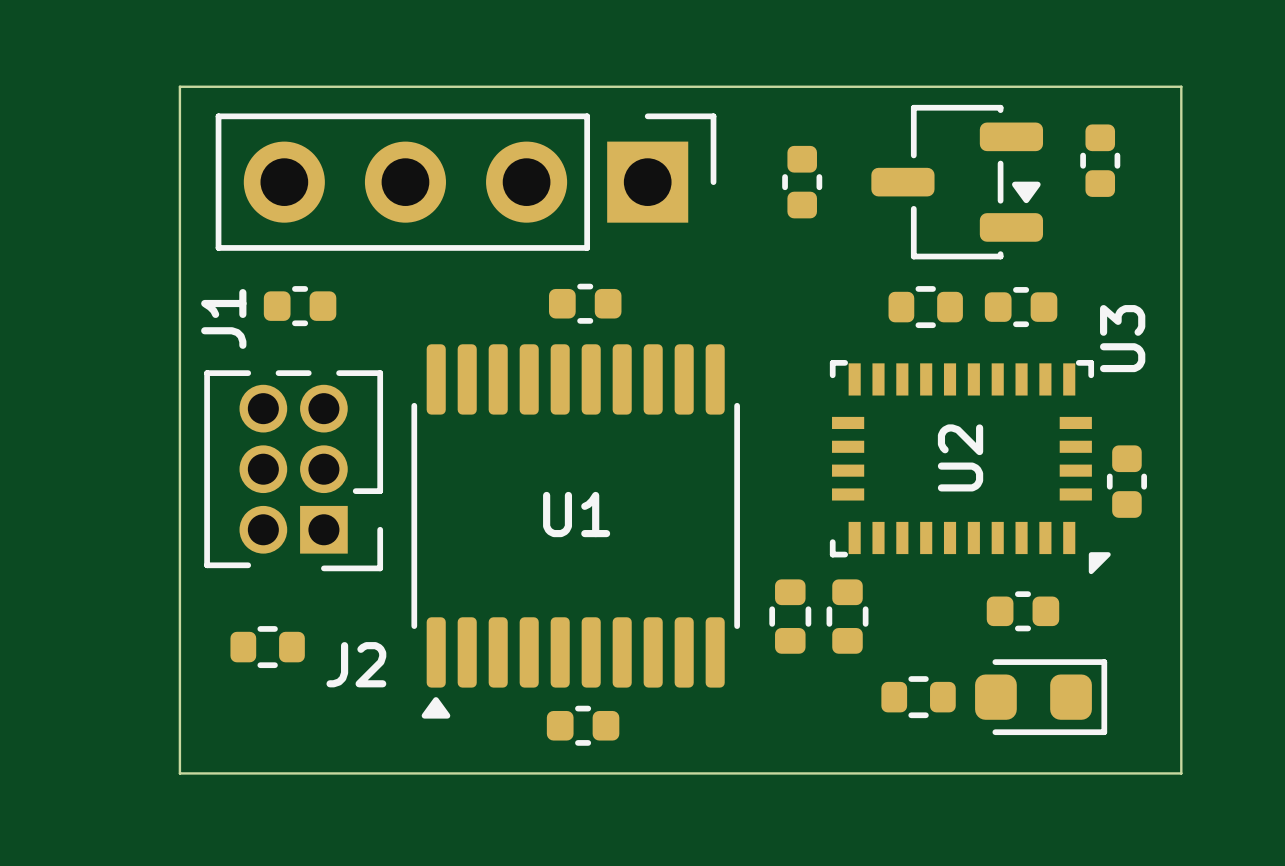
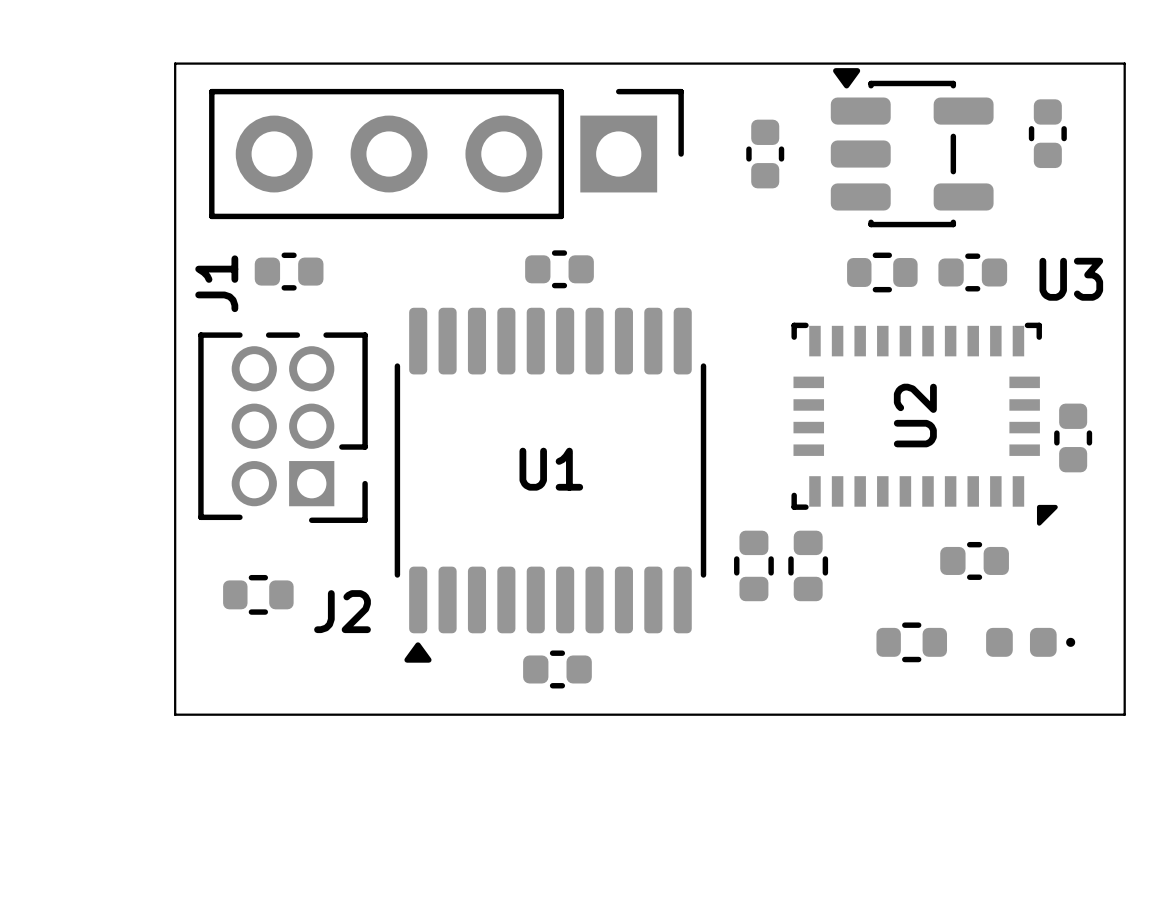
U3 footprint: [871, 104, 1044, 260] -> [830, 68, 994, 228]
U3 name rotation: 0° (1122, 338) -> 90° clockwise (1071, 279)
part footprint: [975, 659, 1108, 736] -> [986, 627, 1076, 657]
part position: (918, 697) -> (911, 642)

